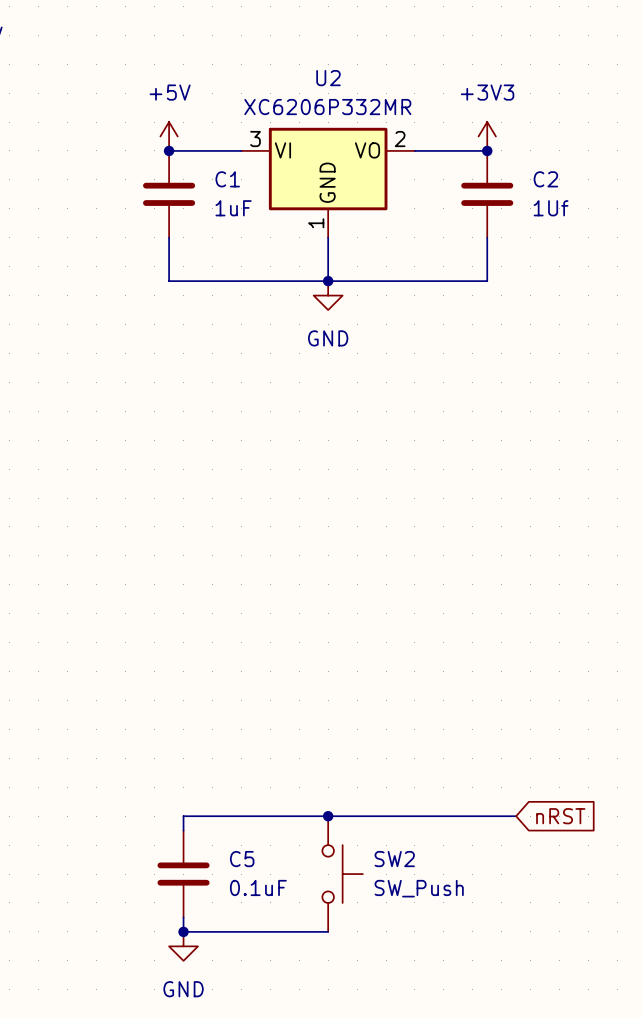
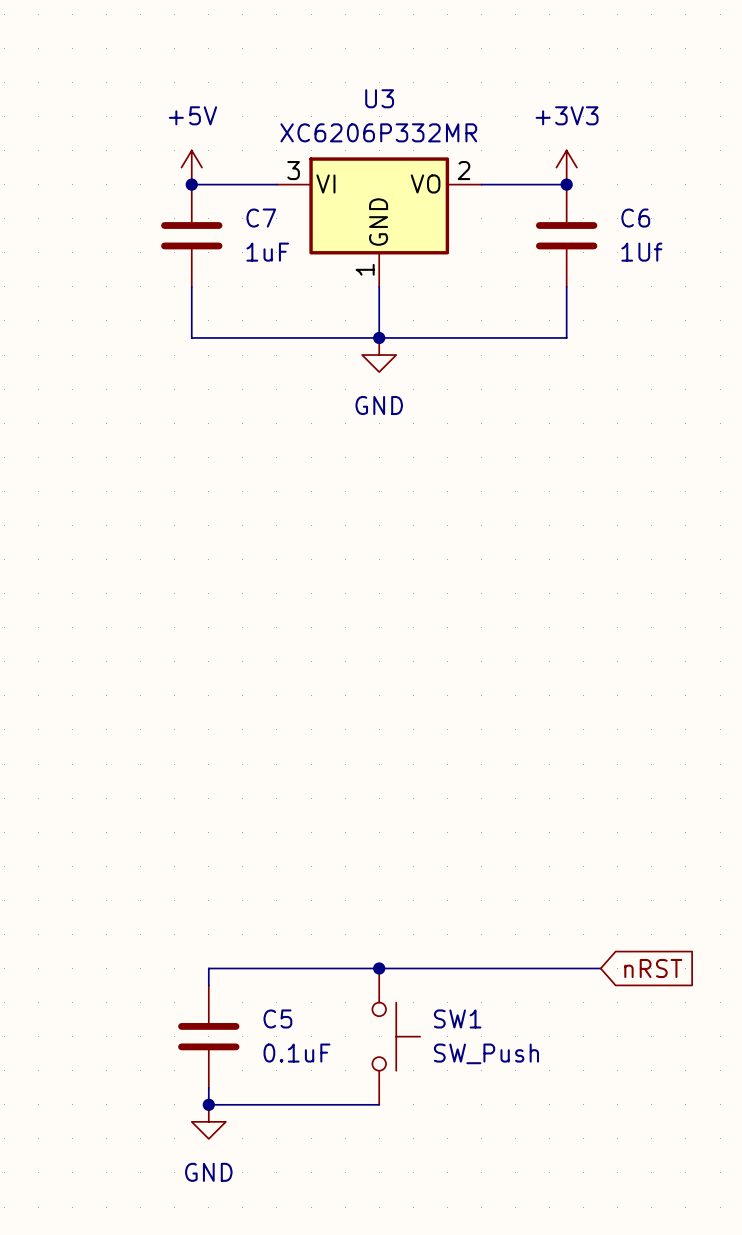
U2 name: U2 (328, 78) -> U3 (379, 98)
C1 name: C1 (227, 179) -> C7 (261, 218)
C2 name: C2 (545, 179) -> C6 (635, 218)
SW2 name: SW2 (394, 859) -> SW1 (457, 1018)

